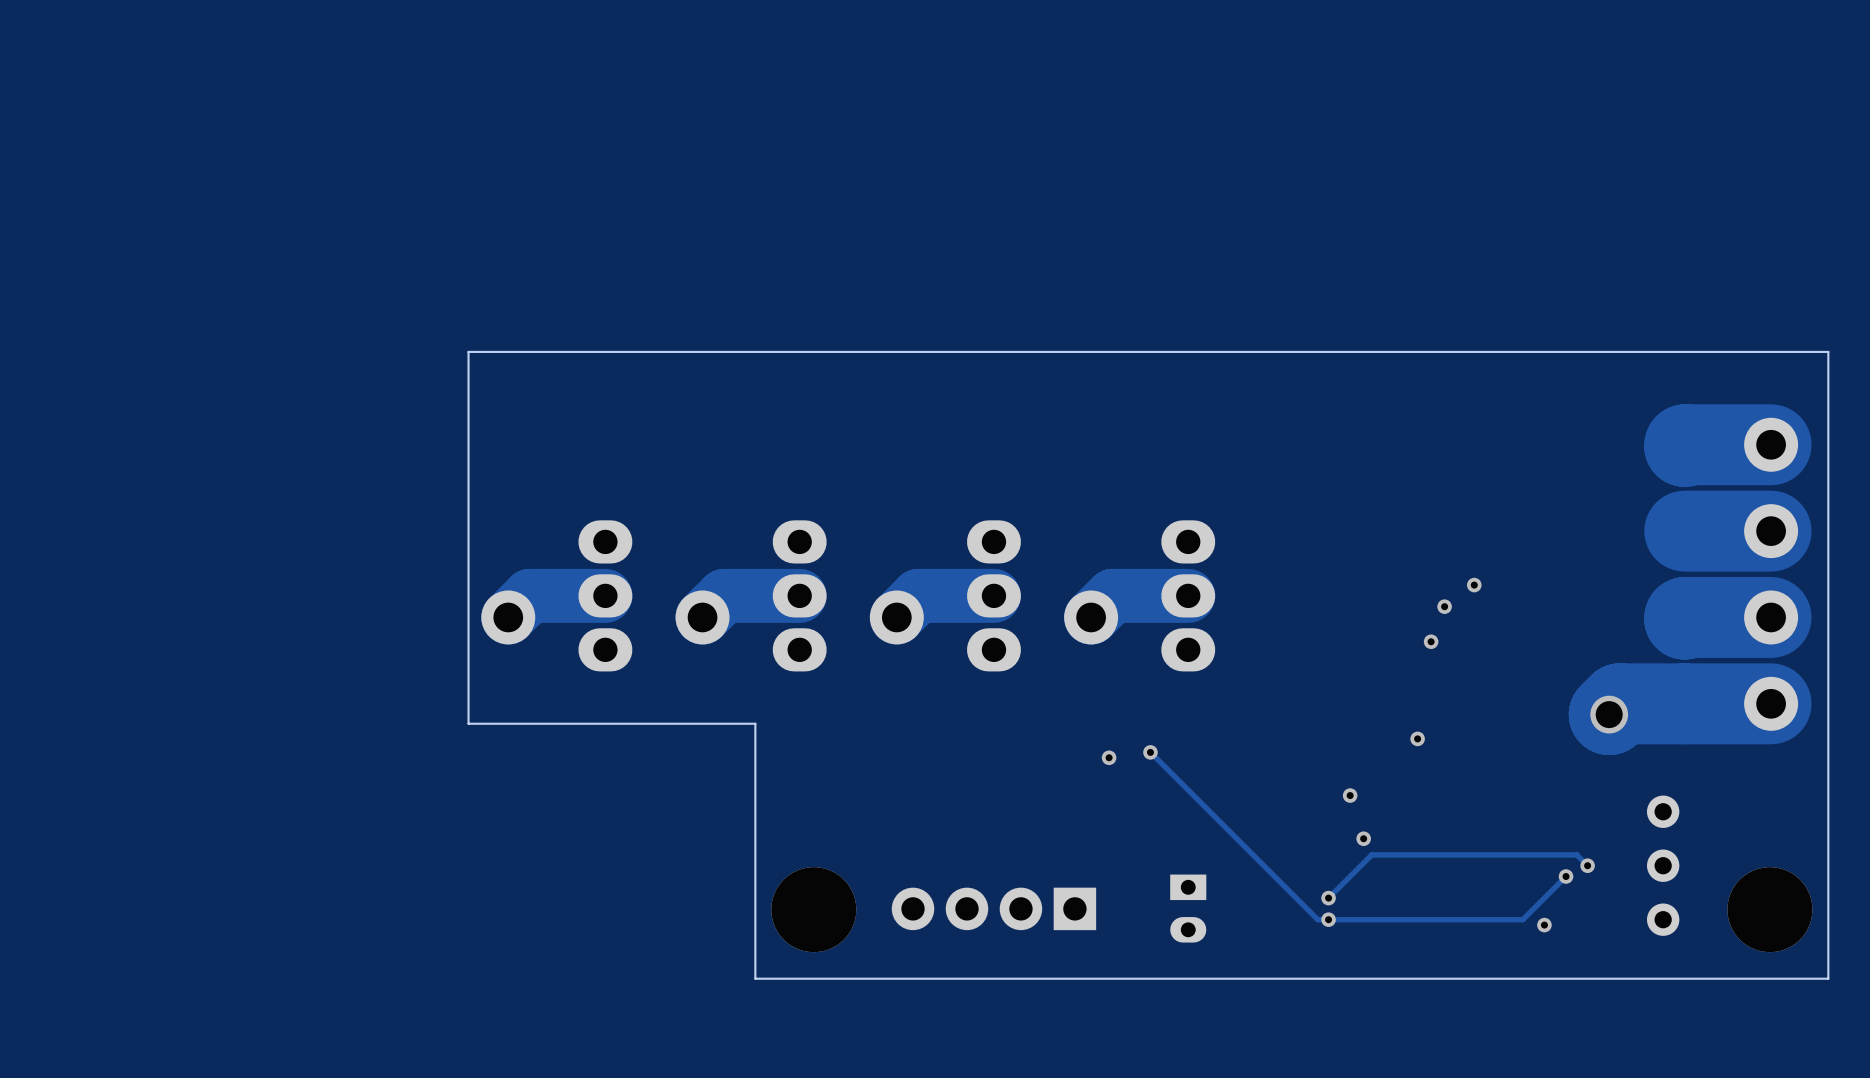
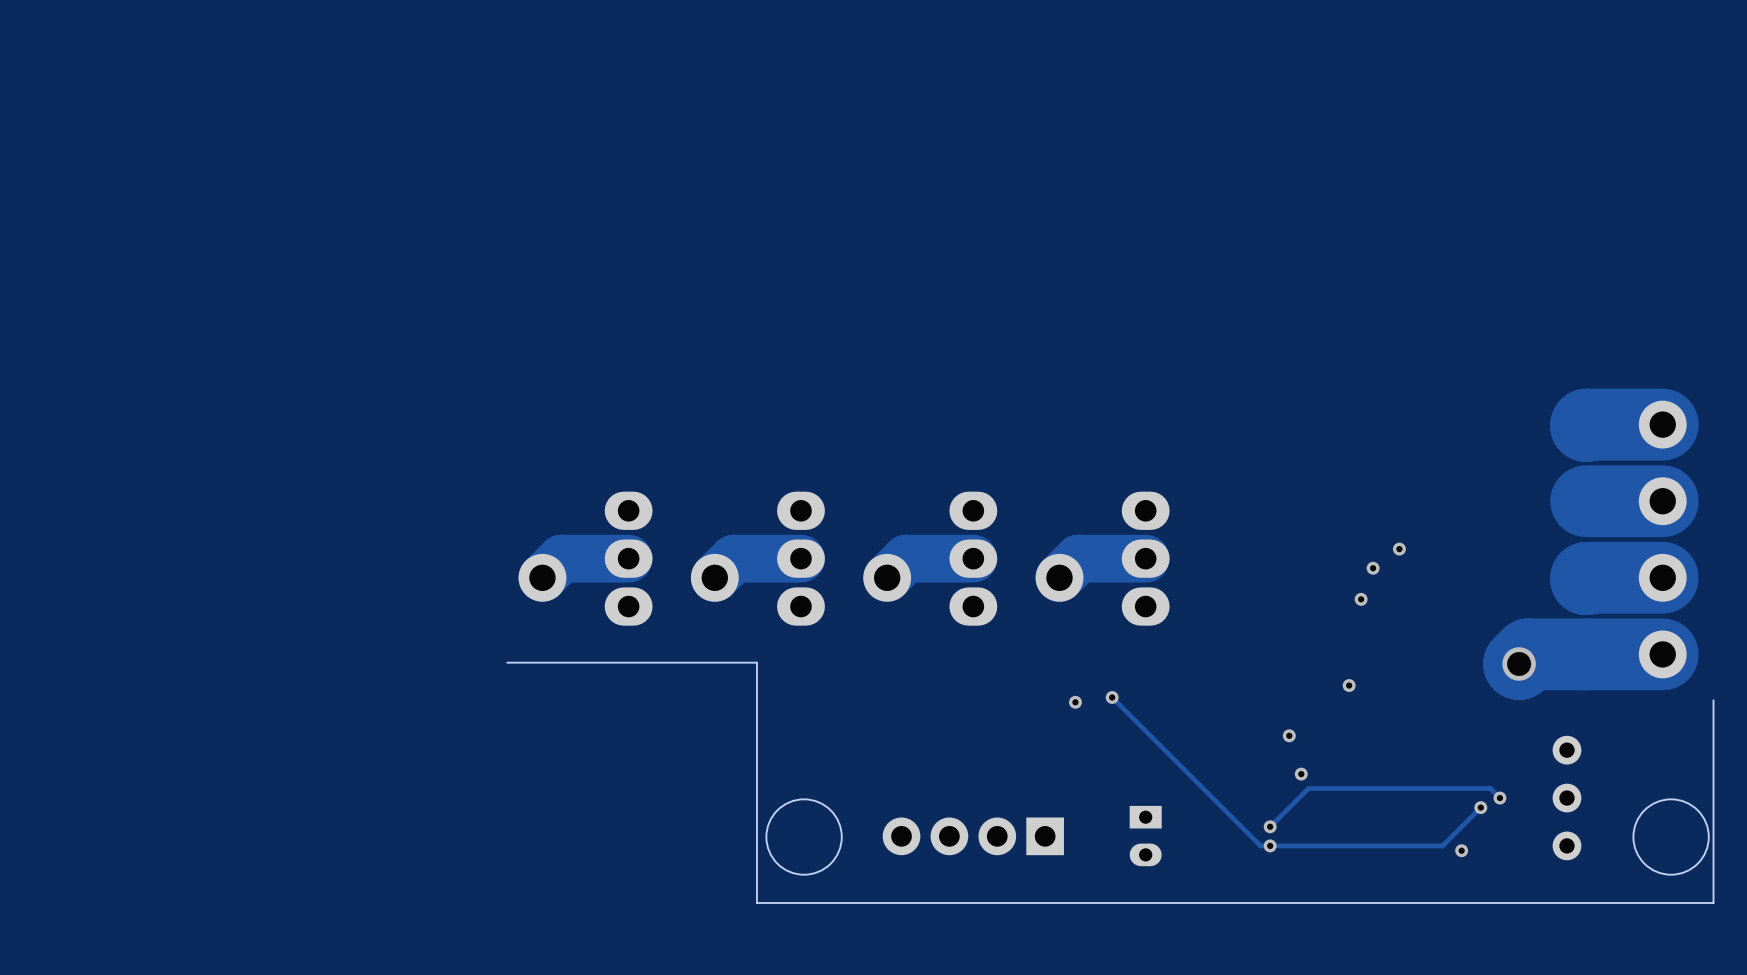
board edge: (1828, 755) (1828, 351) (468, 351) (468, 723) (755, 723) (755, 978) (1828, 978) -> (507, 662) (756, 662) (756, 902) (1713, 902) (1713, 898)
round board edge: none -> [765, 798, 843, 876]
round board edge: none -> [1632, 798, 1710, 876]
part: (813, 909) -> none
part: (1769, 909) -> none

